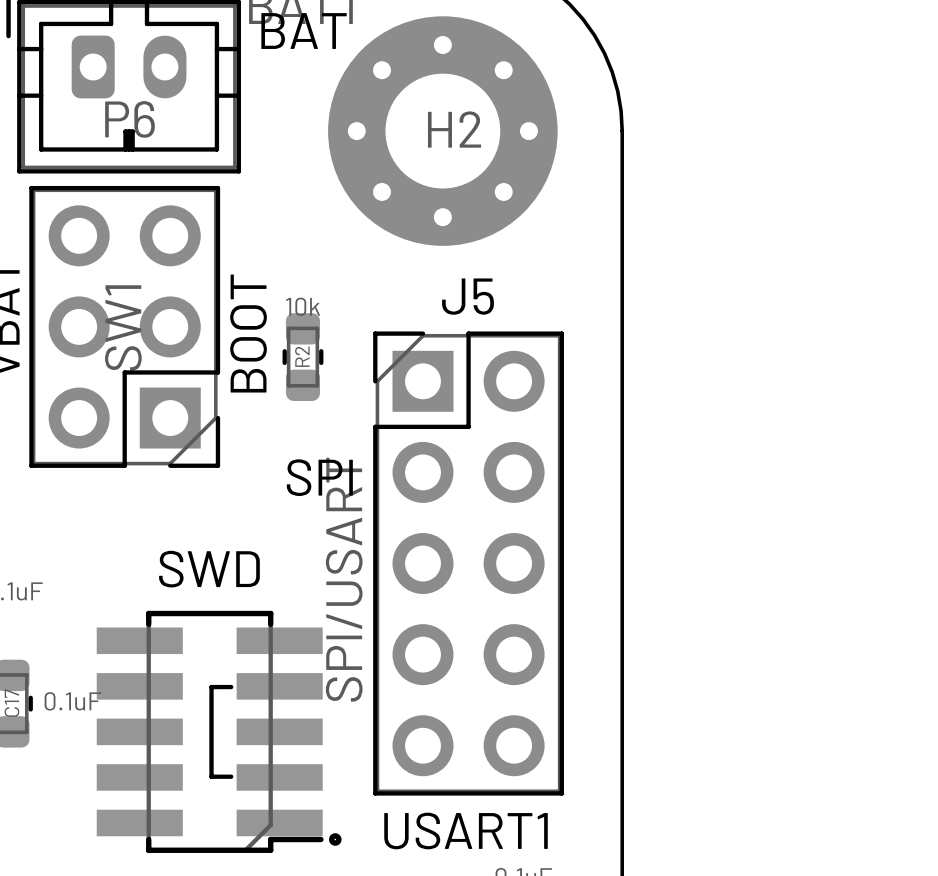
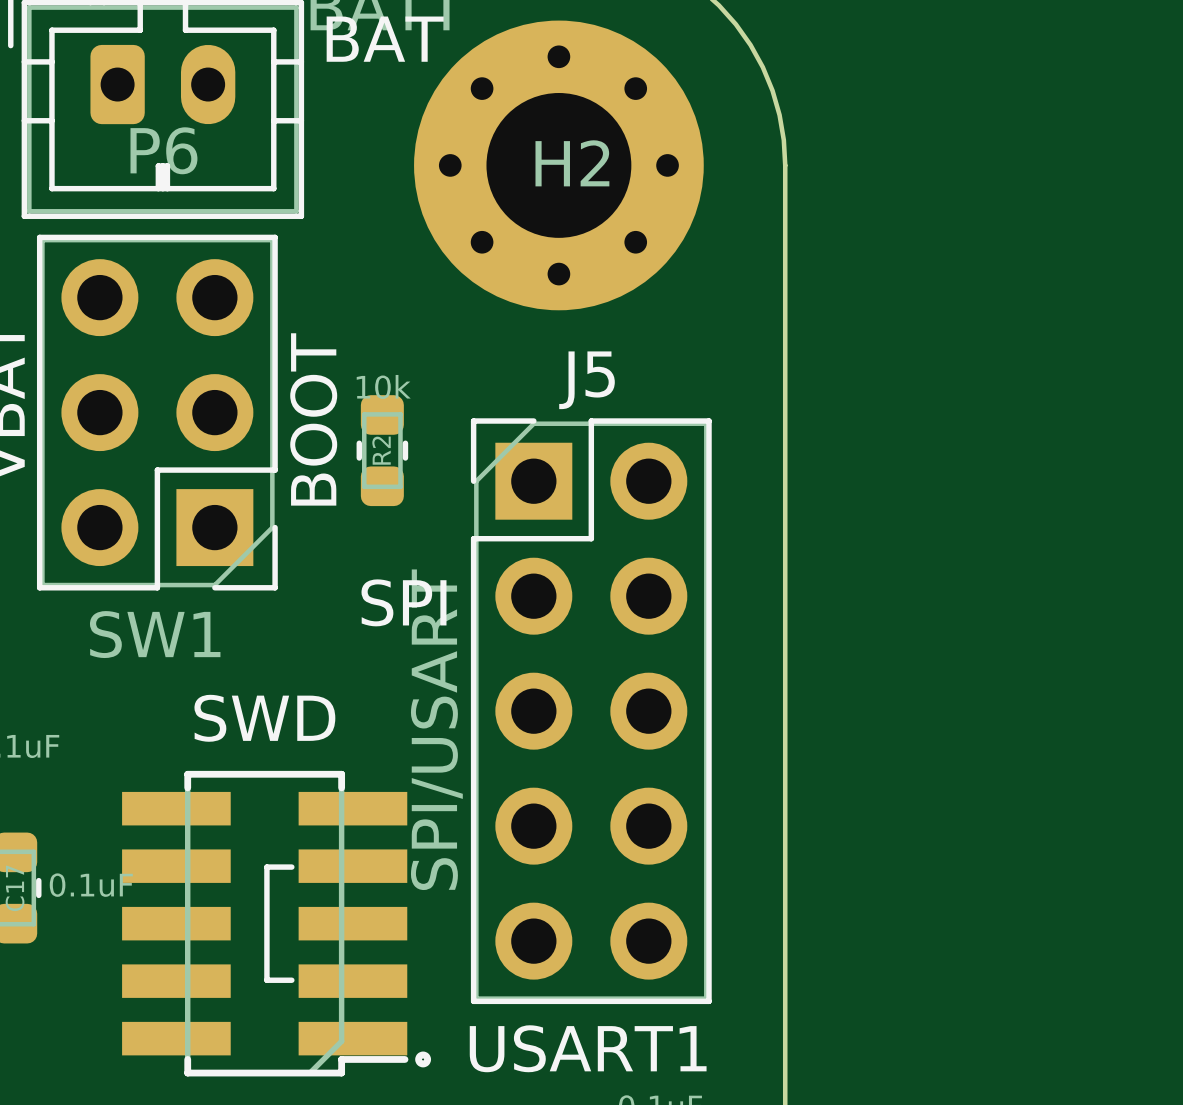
SW1 name rotation: 0° (123, 327) -> 90° clockwise (155, 634)
SW1 name position: SW1 (123, 327) -> SW1 (155, 634)

